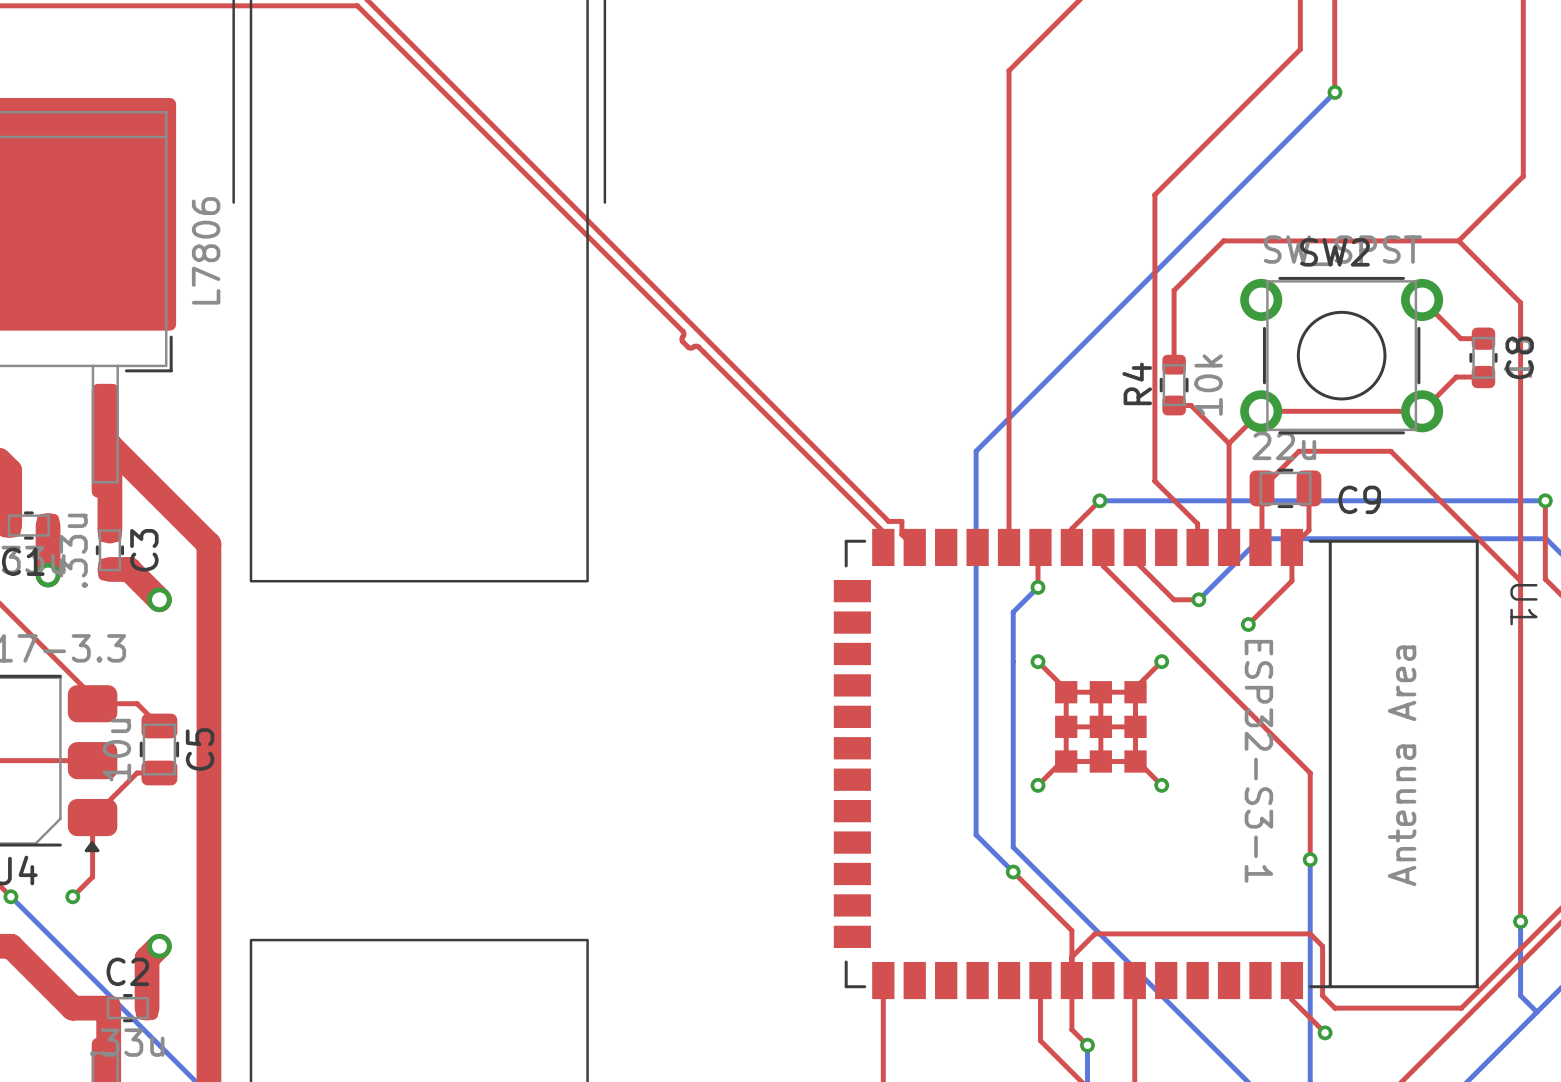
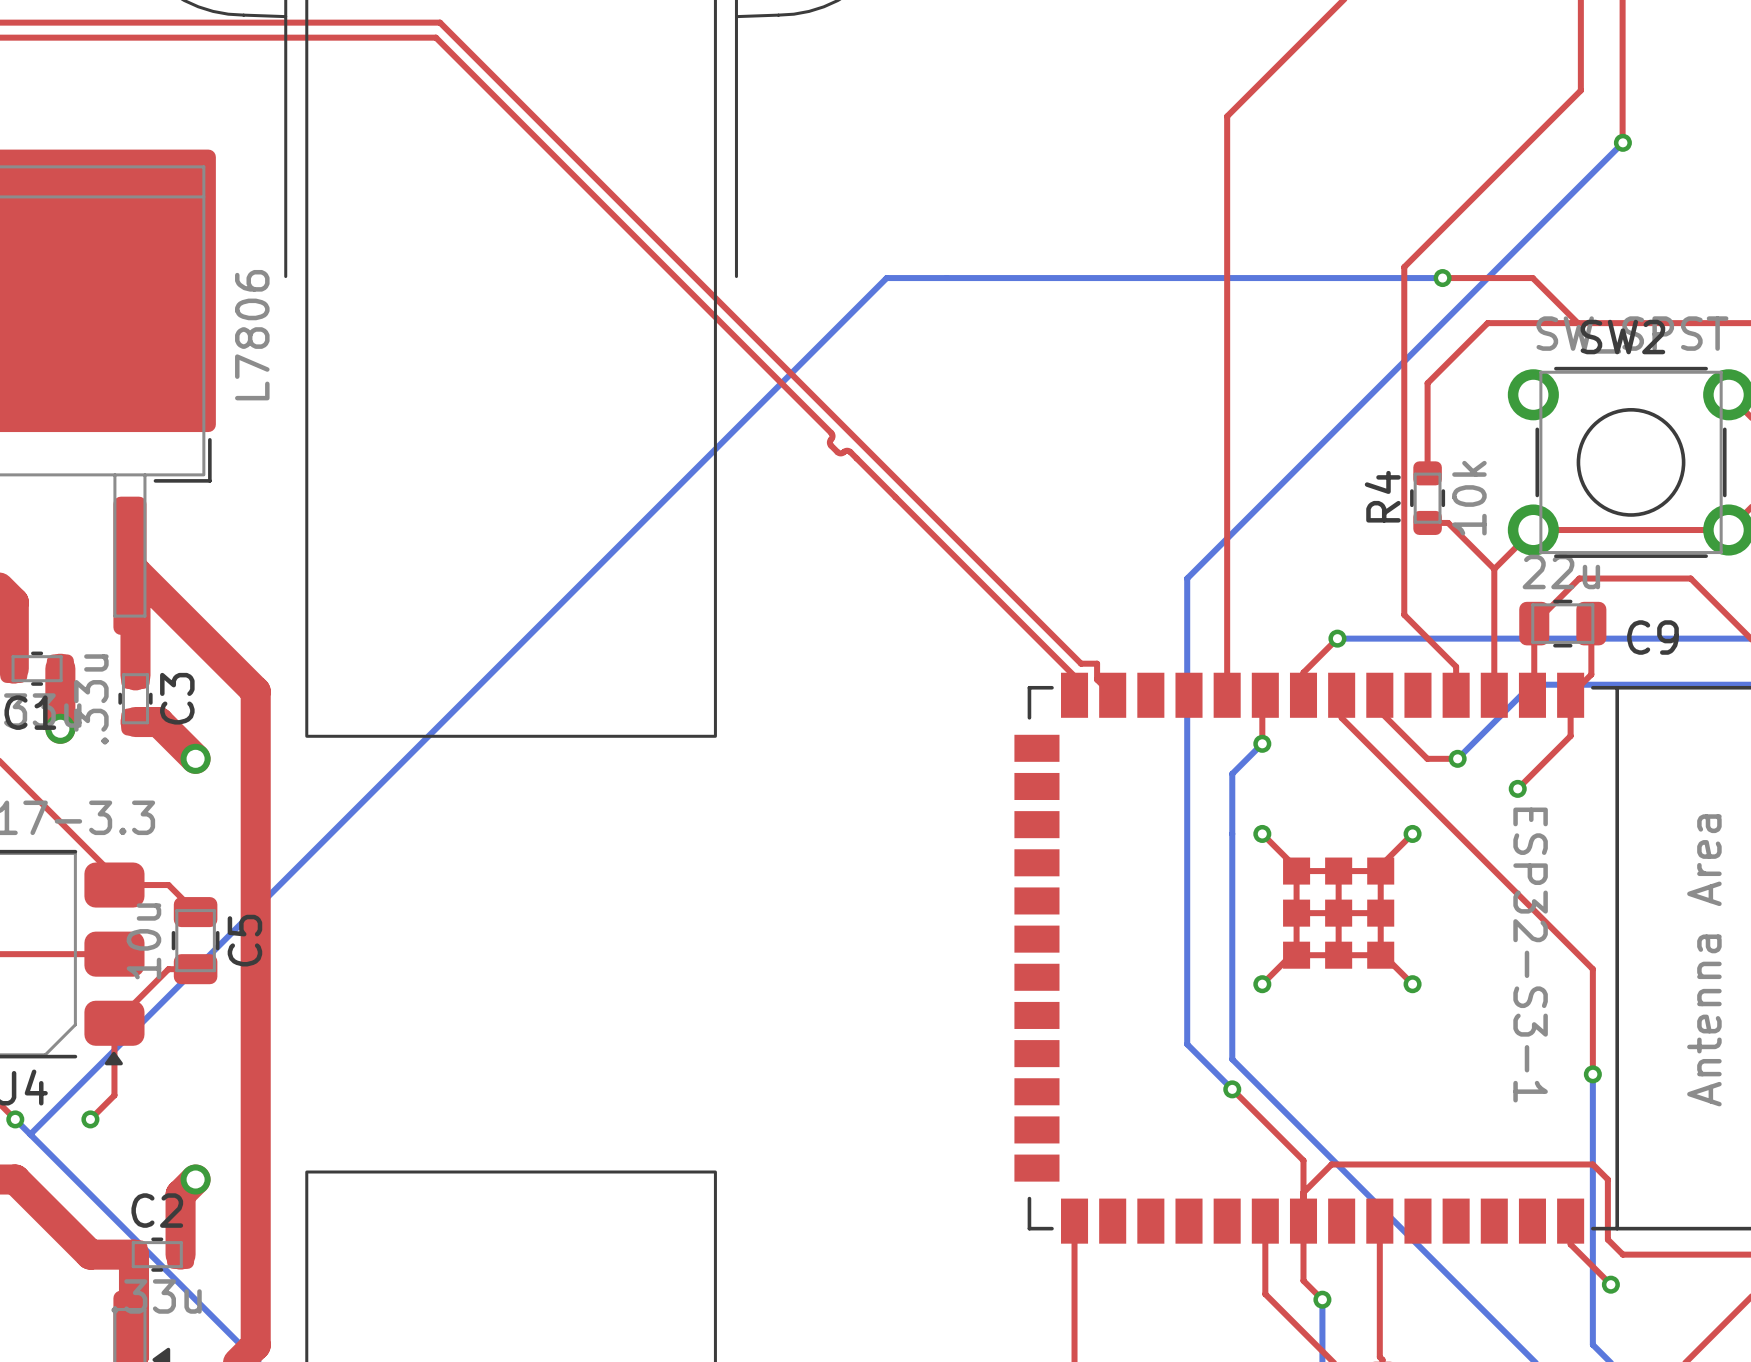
top track: none -> (1442, 278) (1532, 278) (1577, 323)
bottom track: none -> (1442, 278) (886, 278) (30, 1134)
via: none -> (1442, 278)

